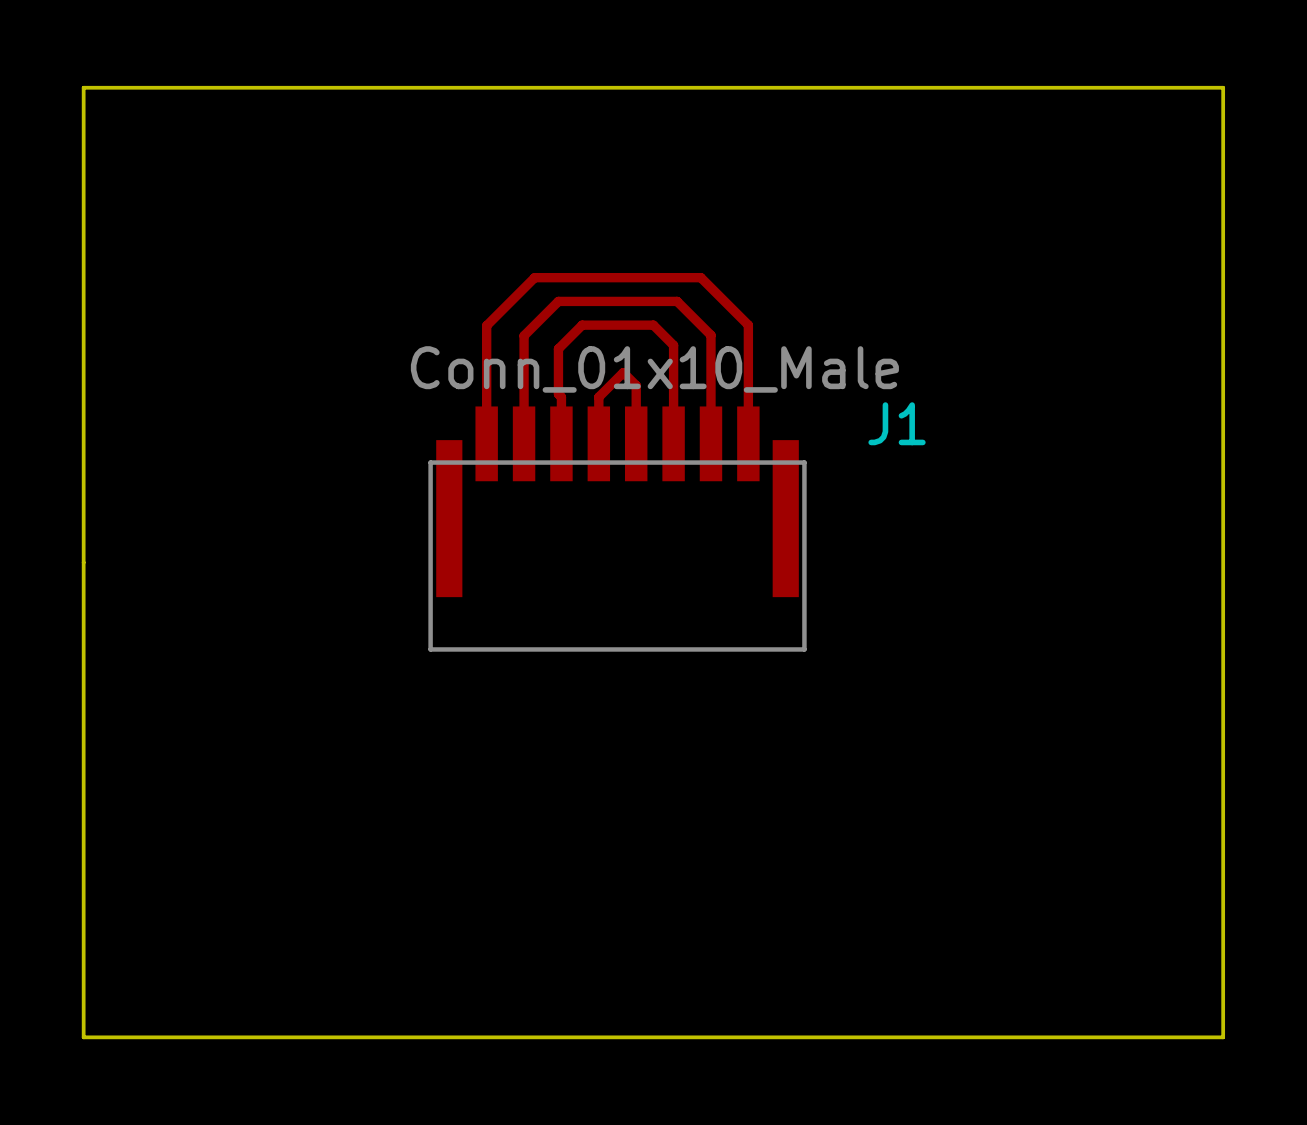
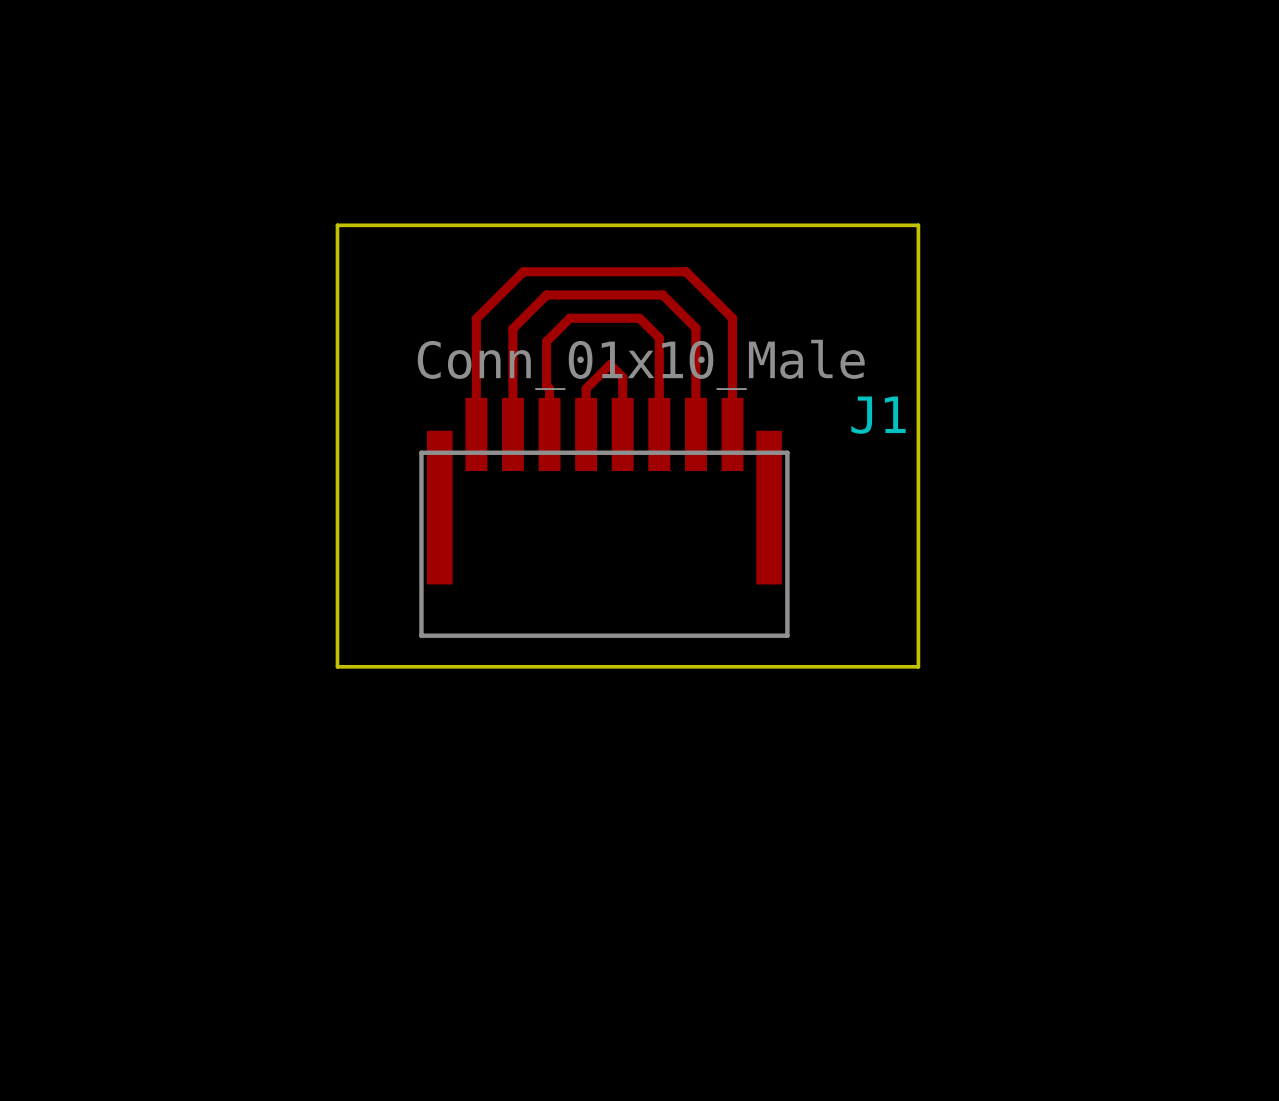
board edge: (83, 87) (83, 1037) (1223, 1037) (1223, 87) (83, 87) -> none
board edge: none -> (337, 225) (337, 666) (918, 666) (918, 225) (337, 225)

